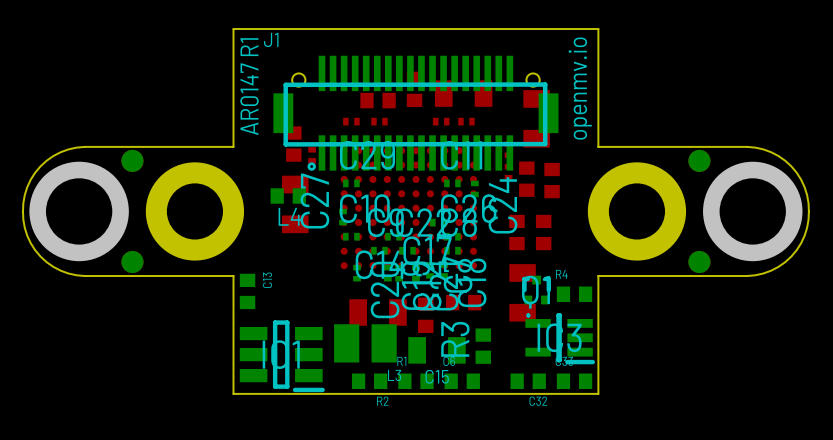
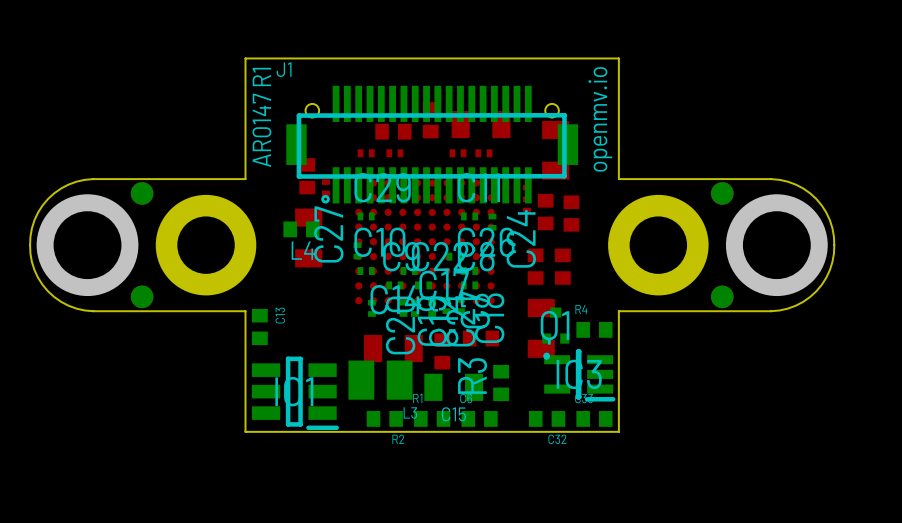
Q1 footprint: [522, 275, 552, 318] -> [542, 307, 570, 360]

